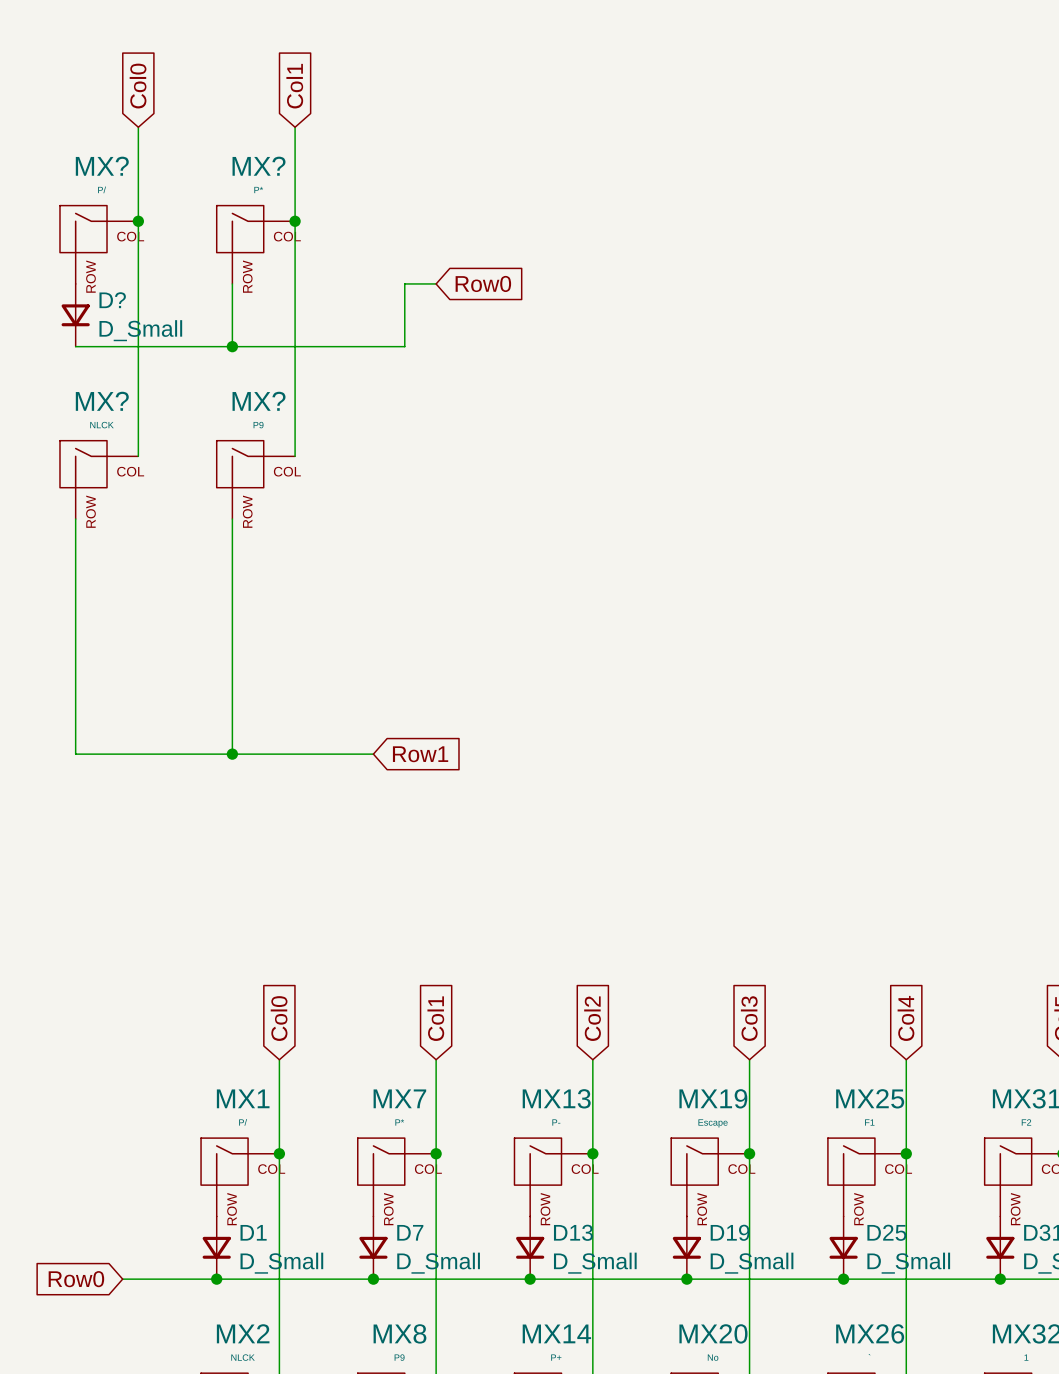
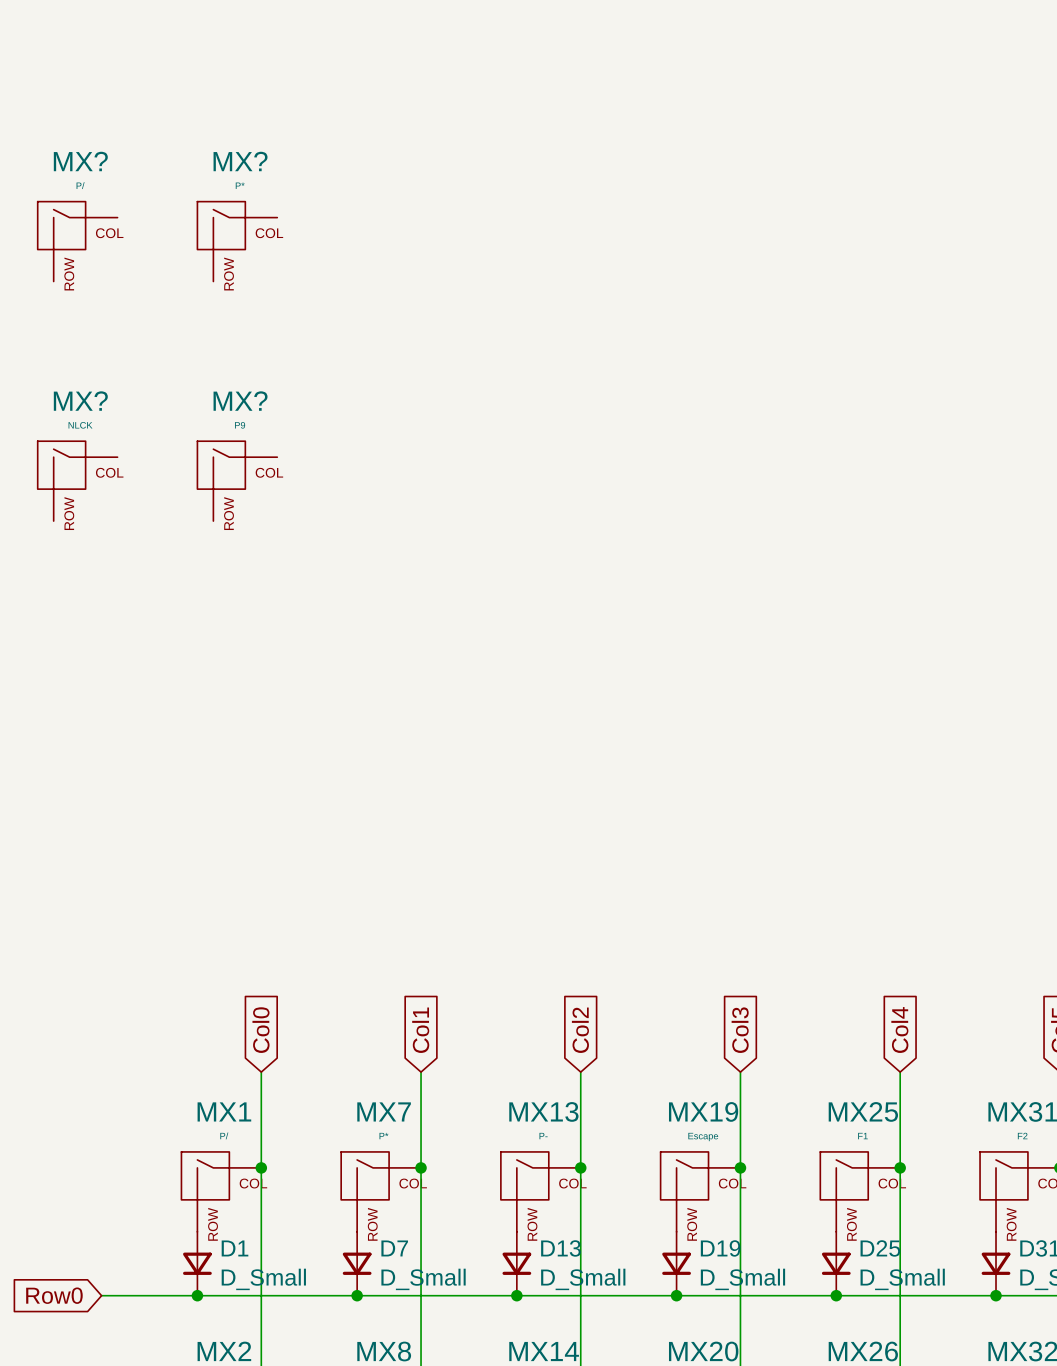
global label: Col0 (138, 86) -> none
global label: Col1 (294, 86) -> none
wire: (138, 127) (138, 456) -> none
wire: (295, 127) (295, 456) -> none
junction: (138, 221) -> none
junction: (295, 221) -> none
wire: (232, 283) (232, 346) -> none
wire: (436, 283) (404, 283) (404, 346) (75, 346) -> none
global label: Row0 (483, 283) -> none
D?: D_Small (75, 315) -> none
junction: (232, 346) -> none
wire: (75, 519) (75, 754) (373, 754) -> none
wire: (232, 519) (232, 754) -> none
junction: (232, 754) -> none
global label: Row1 (420, 754) -> none

